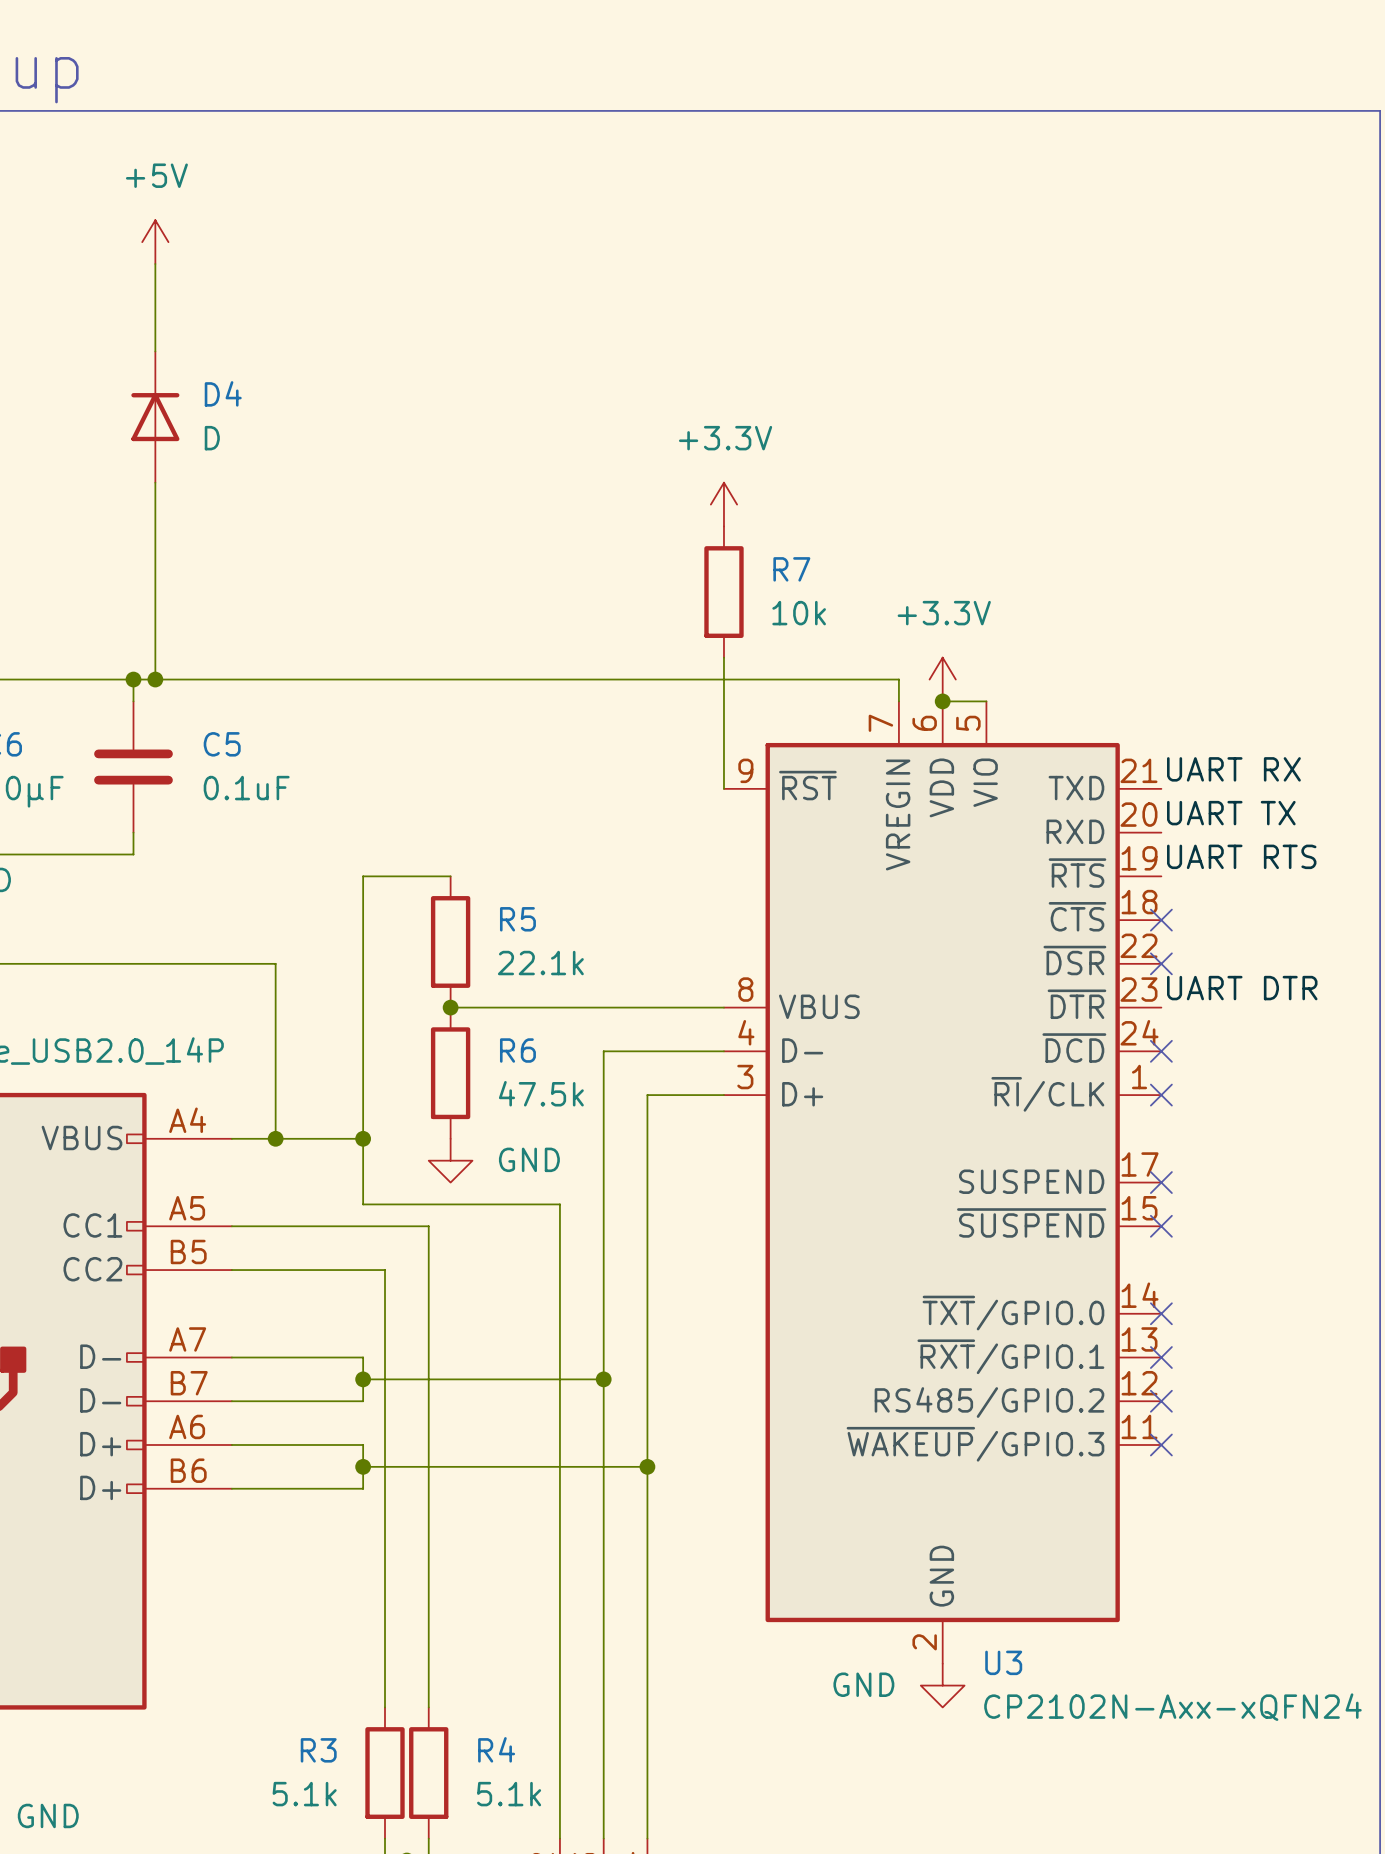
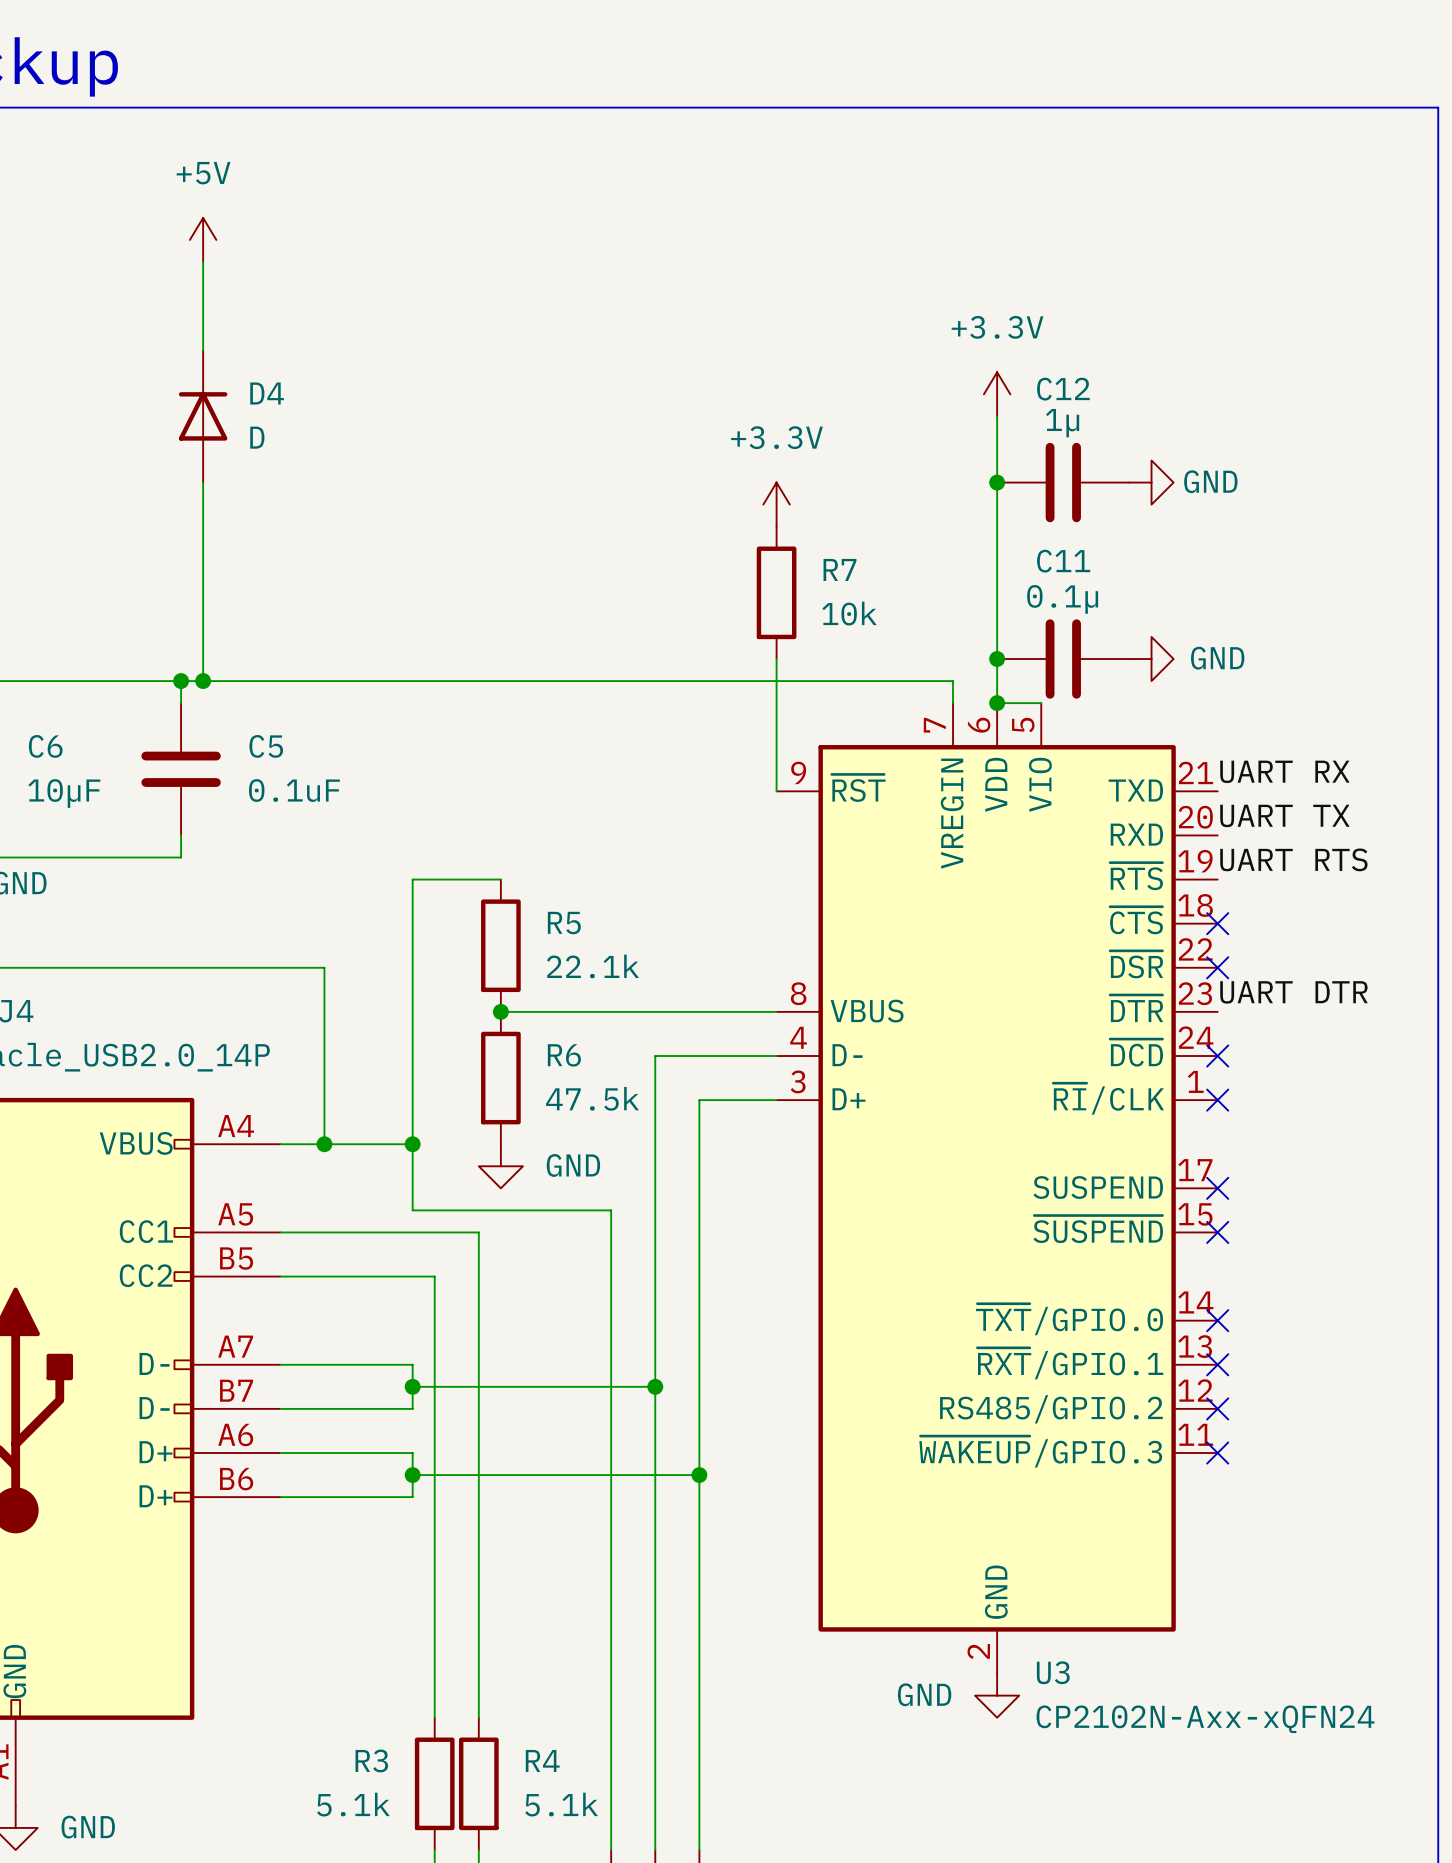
wire: none -> (997, 416) (997, 703)
junction: none -> (997, 482)
C12: none -> 1µ (1063, 482)
power symbol: none -> GND (1151, 482)
junction: none -> (997, 659)
C11: none -> 0.1µ (1063, 659)
power symbol: none -> GND (1151, 659)
power symbol position: +3.3V (942, 679) -> +3.3V (997, 394)

